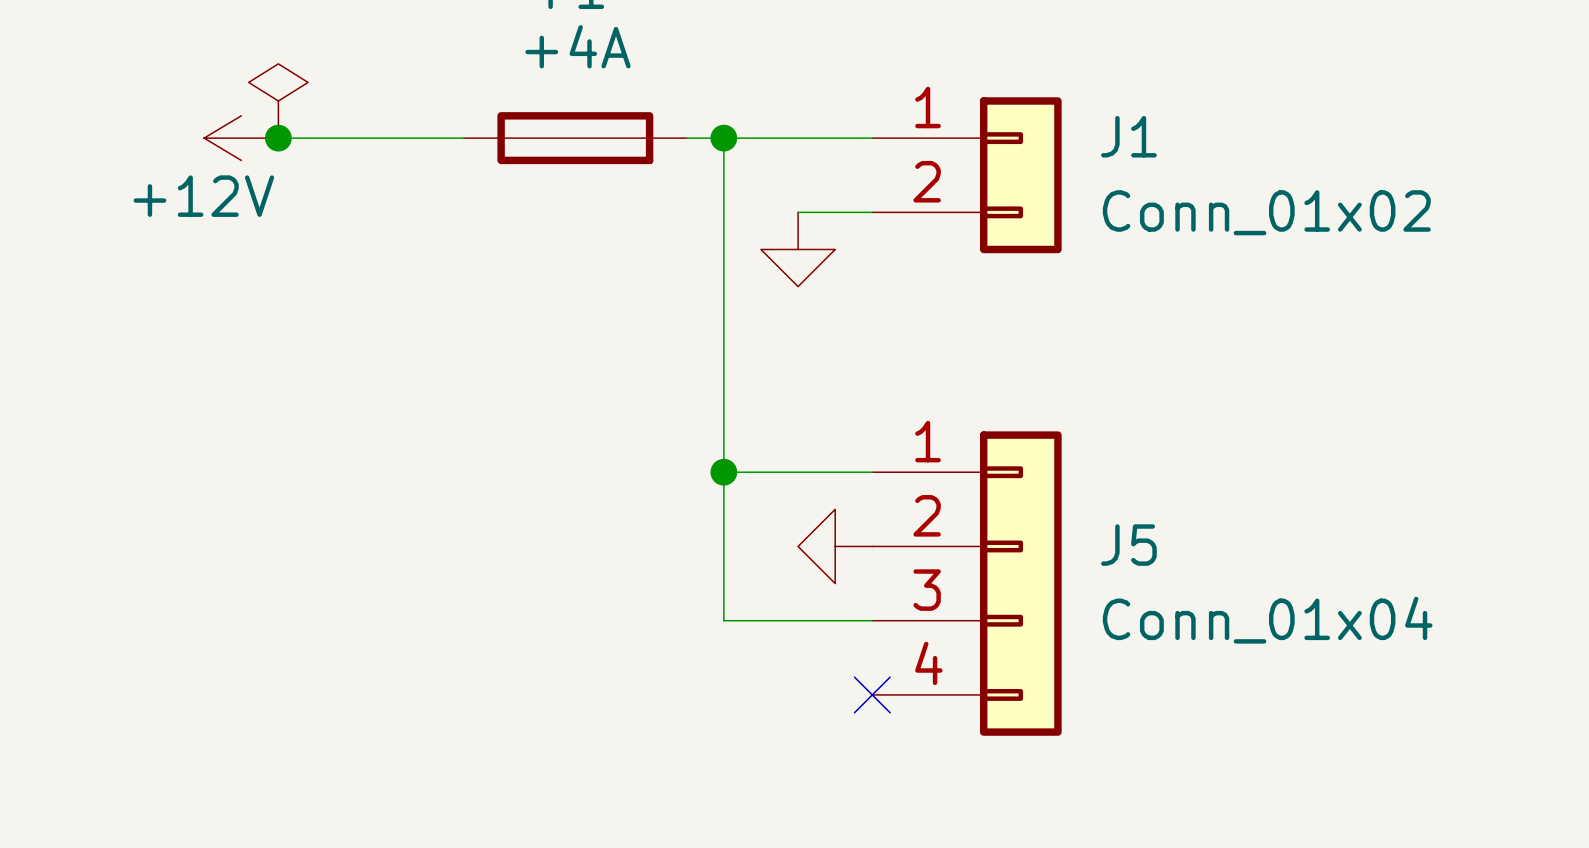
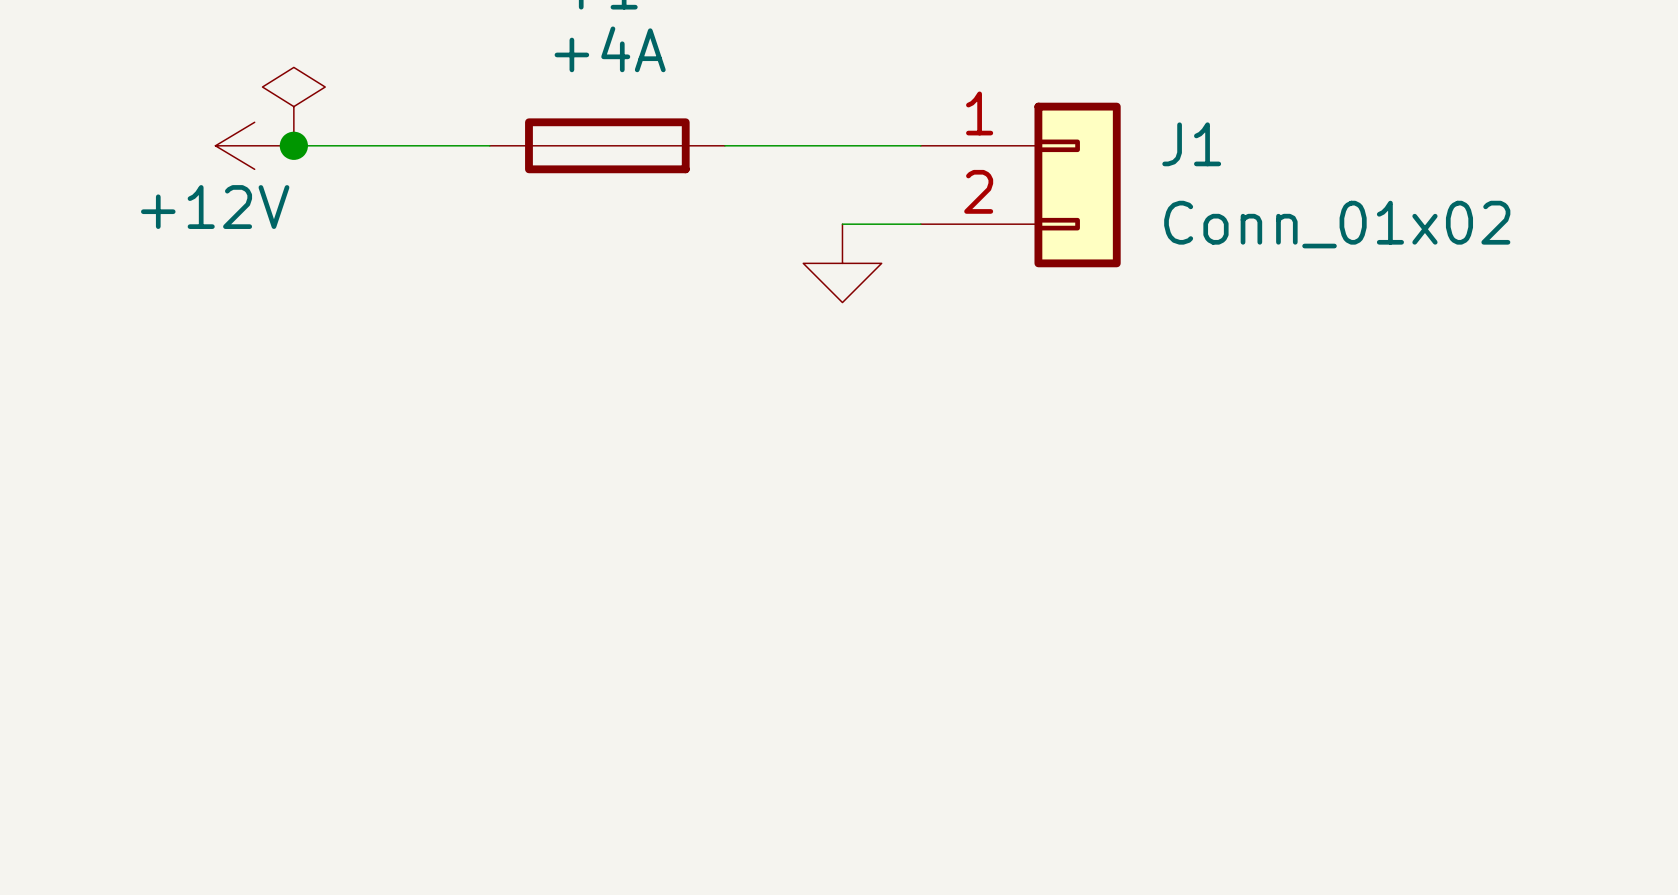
wire: (723, 138) (723, 620) (872, 620) -> none
junction: (723, 138) -> none
wire: (723, 472) (872, 472) -> none
junction: (723, 472) -> none
power symbol: (835, 546) -> none
J5: Conn_01x04 (966, 583) -> none
no-connect mark: (872, 694) -> none

